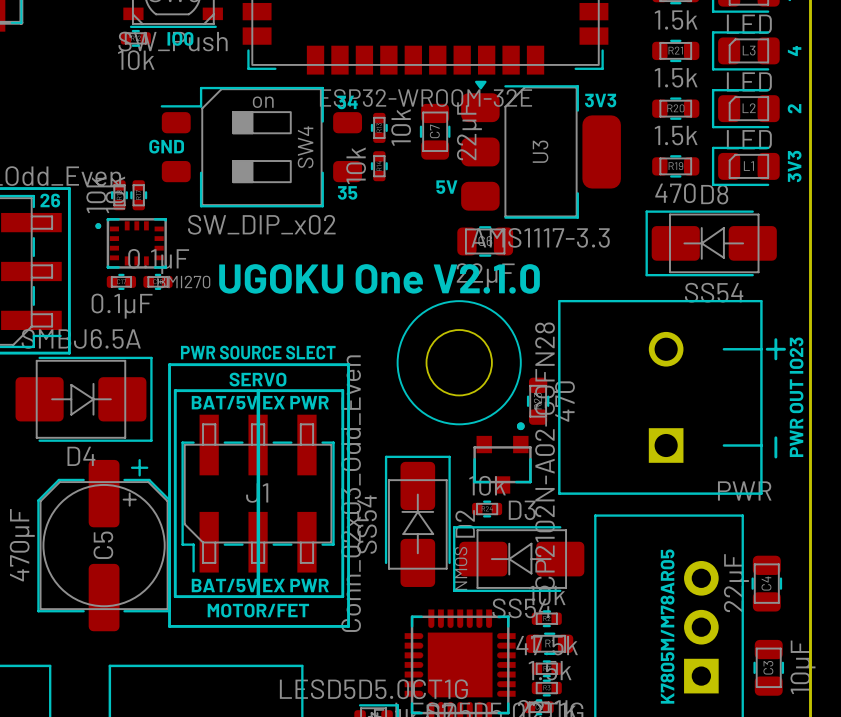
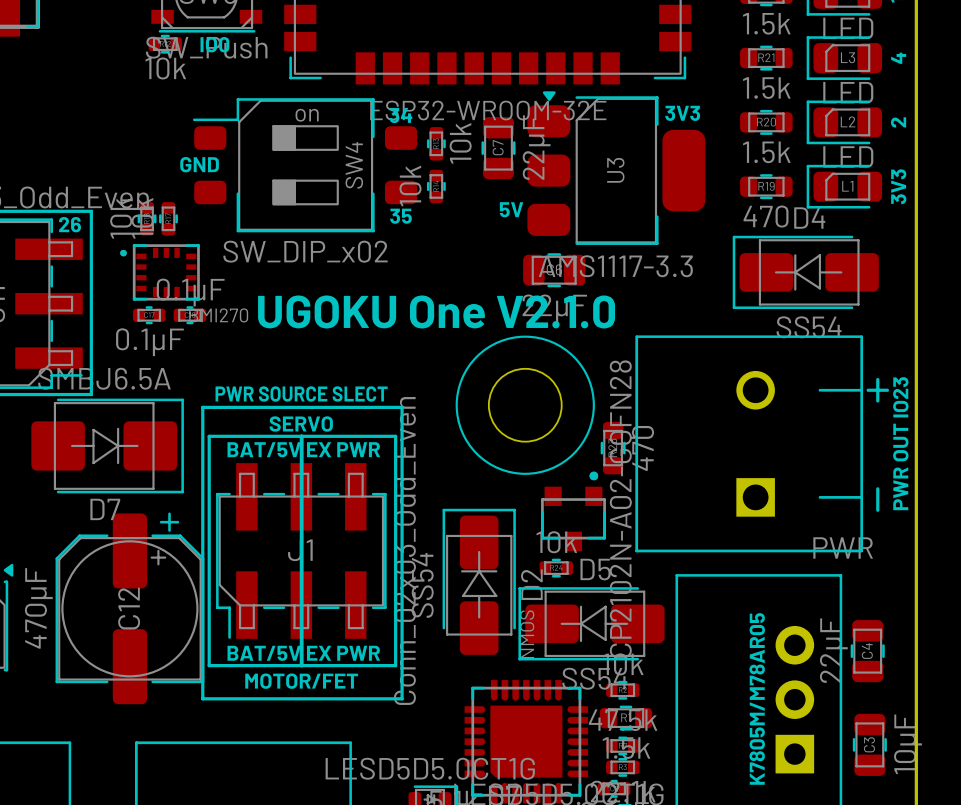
D8 name: D8 (714, 194) -> D4 (809, 218)
D4 name: D4 (81, 456) -> D7 (105, 509)
D3 name: D3 (522, 510) -> D5 (595, 569)
C5 name: C5 (103, 545) -> C12 (129, 608)

